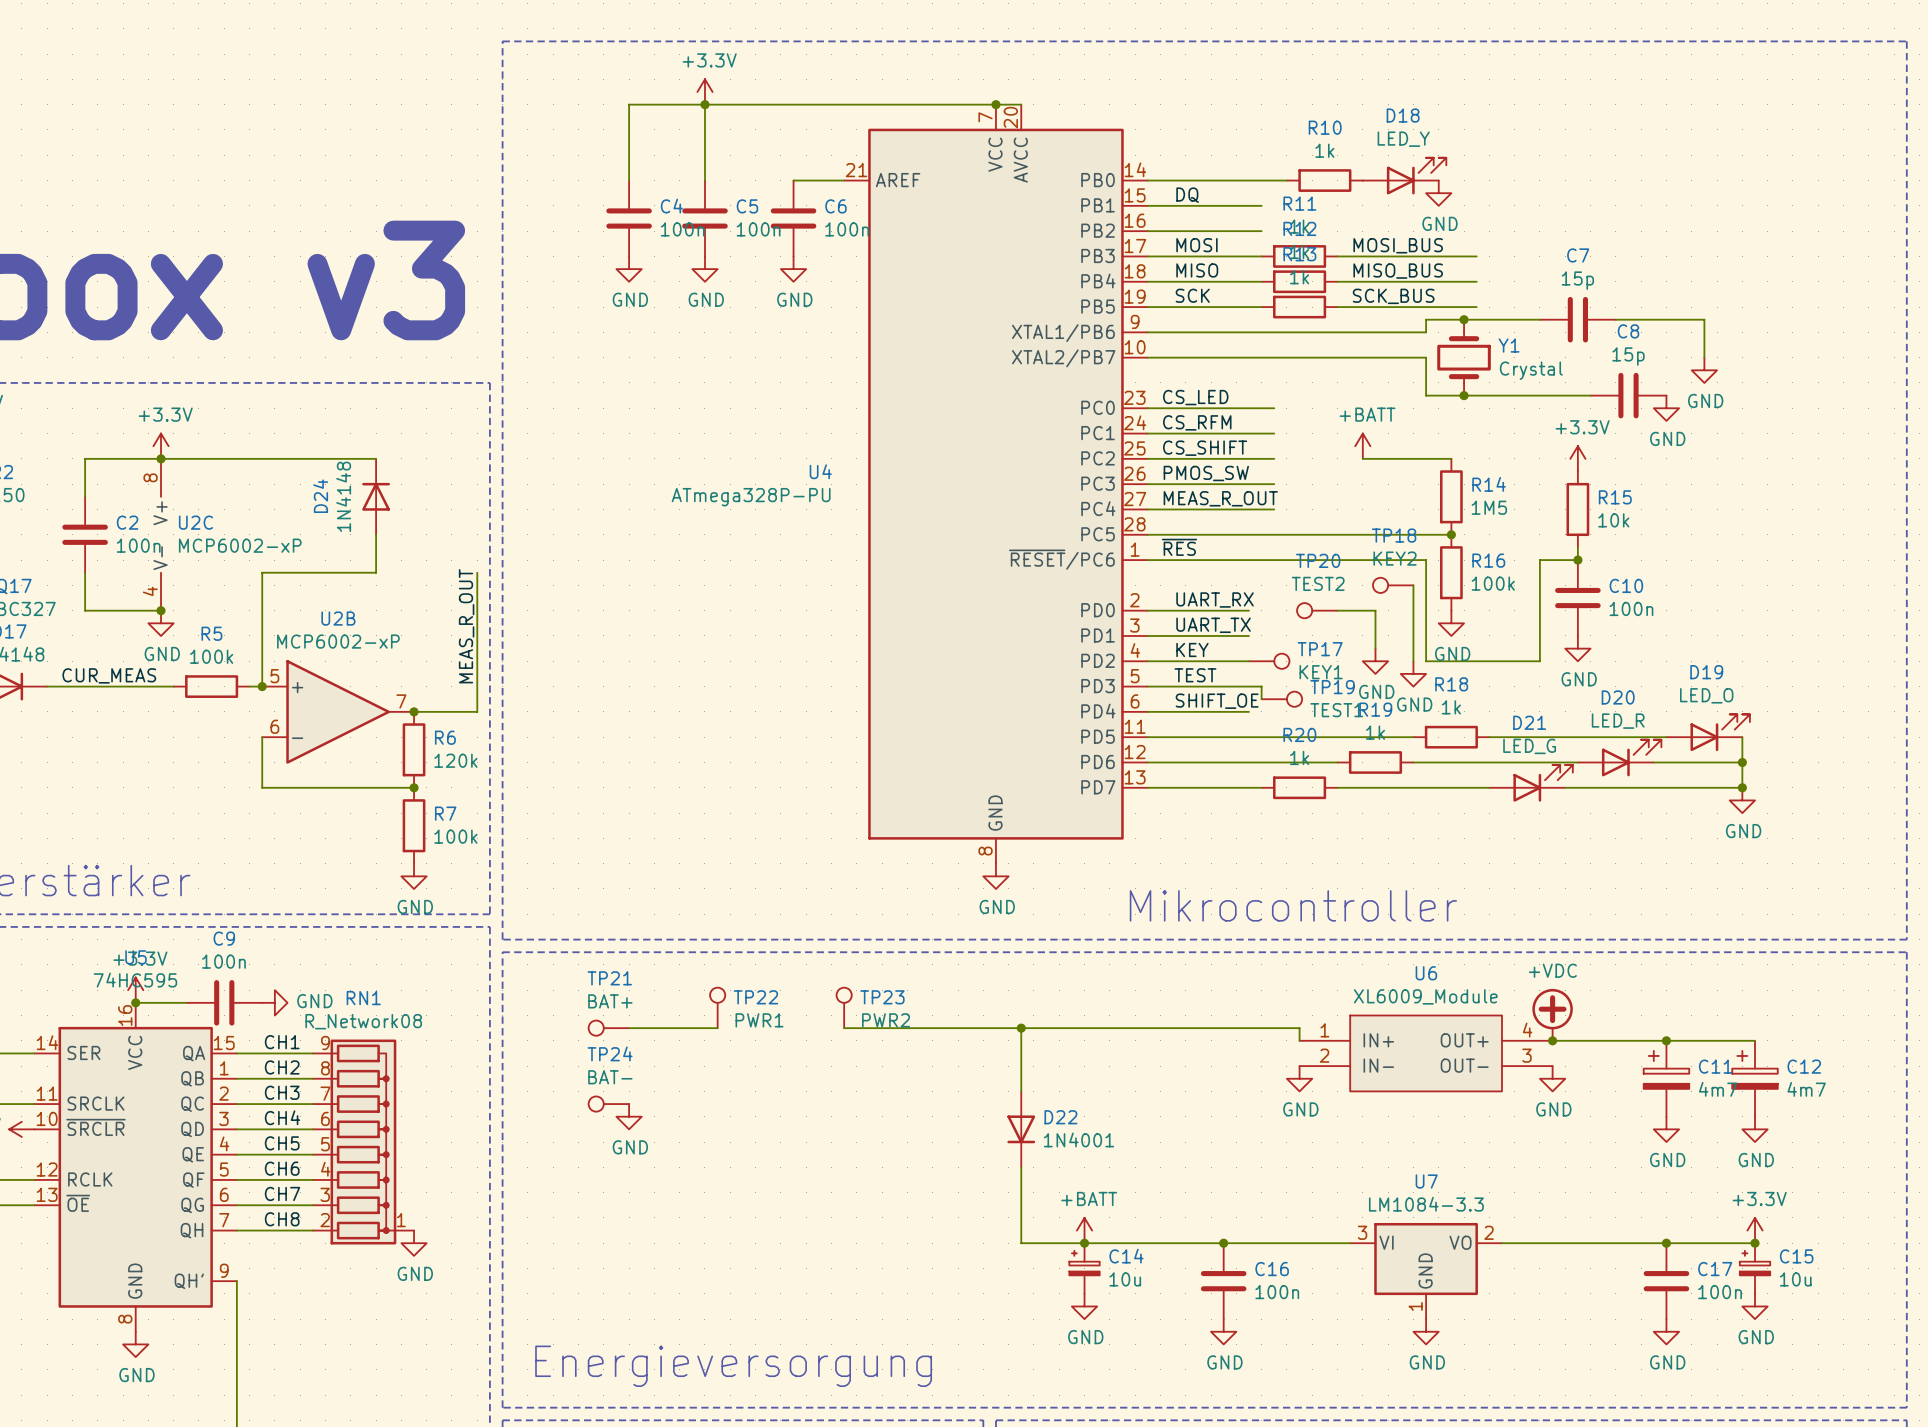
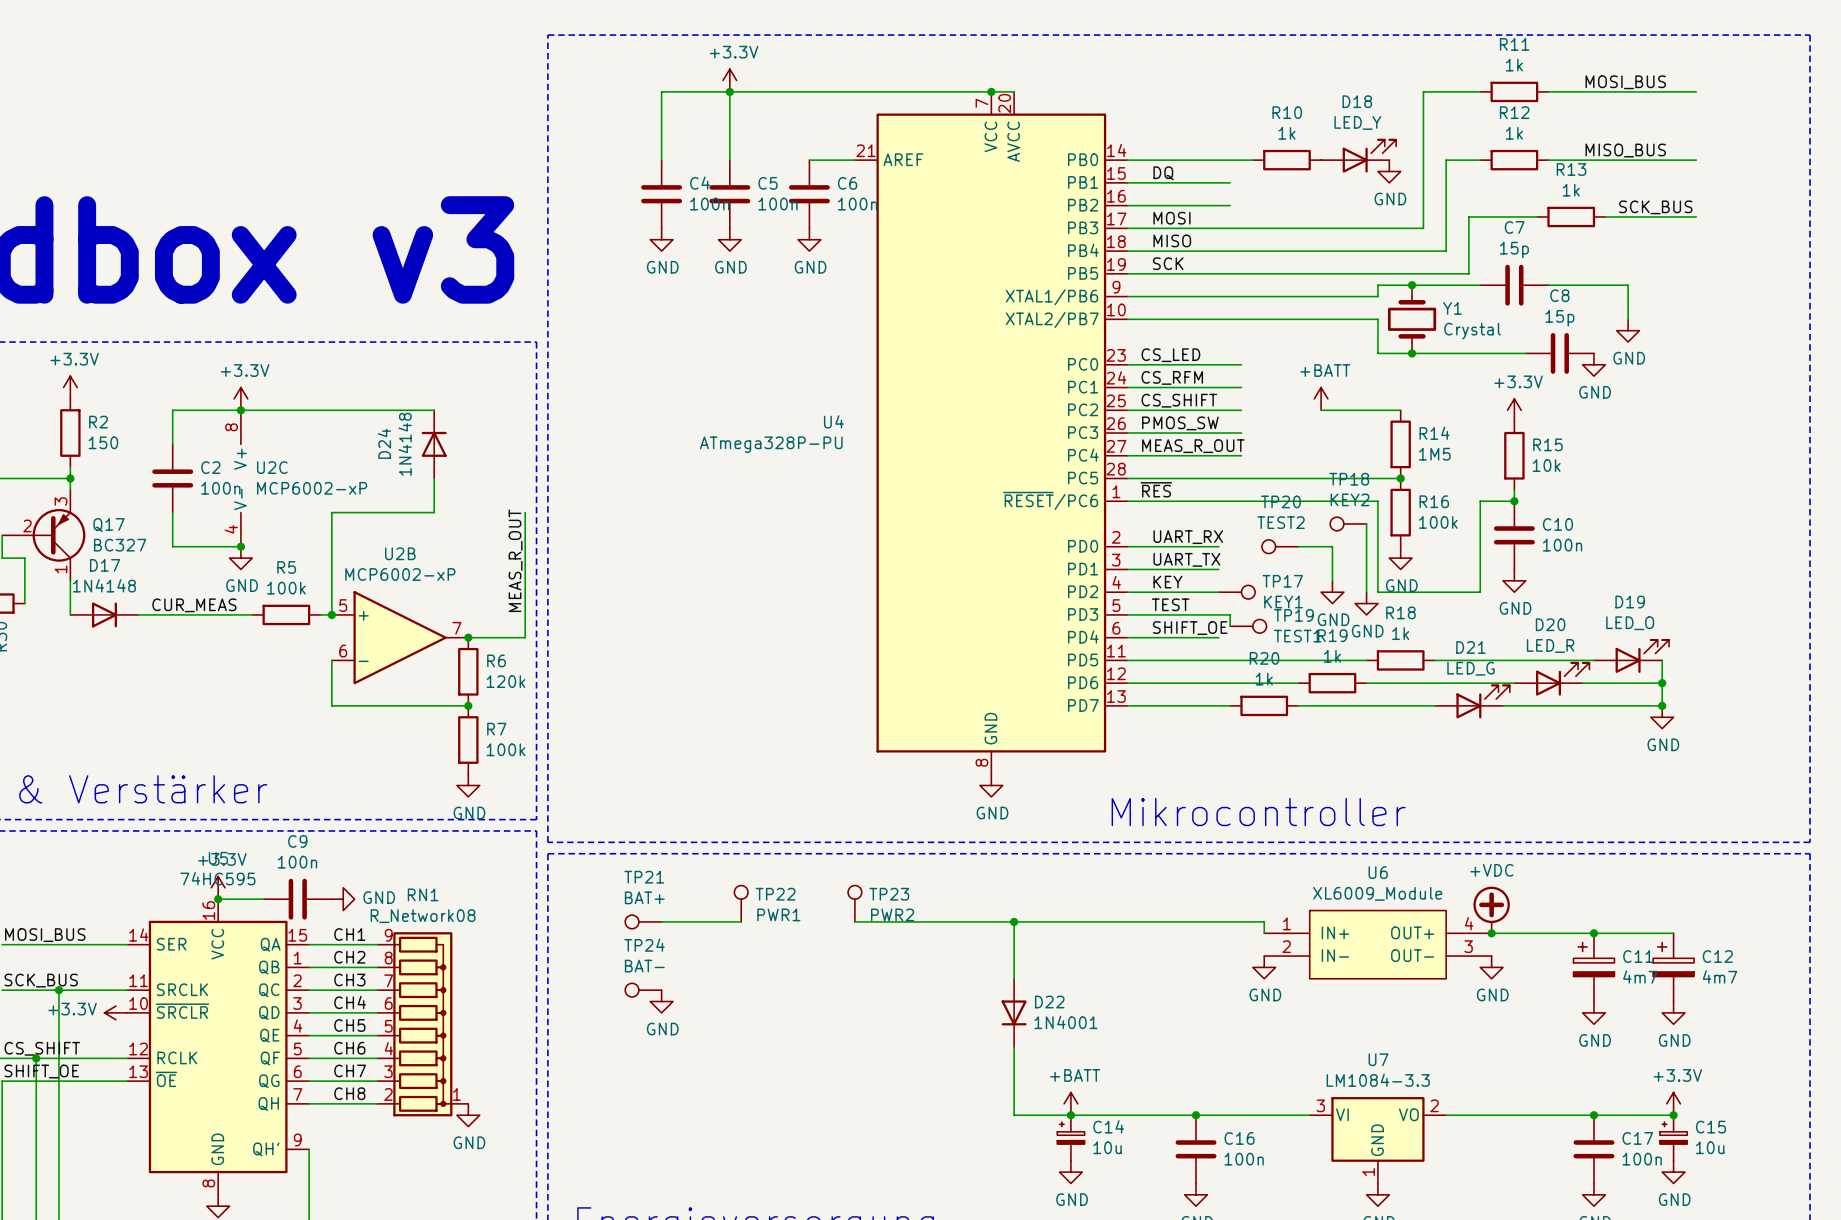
label: none -> MOSI_BUS (1625, 82)
wire: none -> (1480, 91) (1423, 91) (1423, 228)
wire: none -> (1548, 91) (1696, 91)
label: none -> MISO_BUS (1625, 150)
wire: none -> (1480, 160) (1446, 160) (1446, 251) (1423, 251)
wire: none -> (1548, 160) (1696, 160)
label: none -> SCK_BUS (1655, 207)
wire: none -> (1537, 216) (1468, 216) (1468, 273) (1423, 273)
wire: none -> (1605, 216) (1696, 216)
label: MOSI_BUS (1398, 245) -> none
wire: none -> (1230, 228) (1298, 228)
R11 position: (1299, 256) -> (1514, 91)
label: MISO_BUS (1398, 271) -> none
wire: none -> (1230, 251) (1298, 251)
R12 position: (1299, 281) -> (1514, 160)
label: SCK_BUS (1393, 296) -> none
wire: none -> (1230, 273) (1298, 273)
R13 position: (1299, 307) -> (1571, 216)

